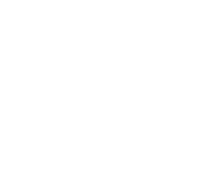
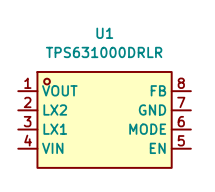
U1: none -> TPS631000DRLR (104, 119)

